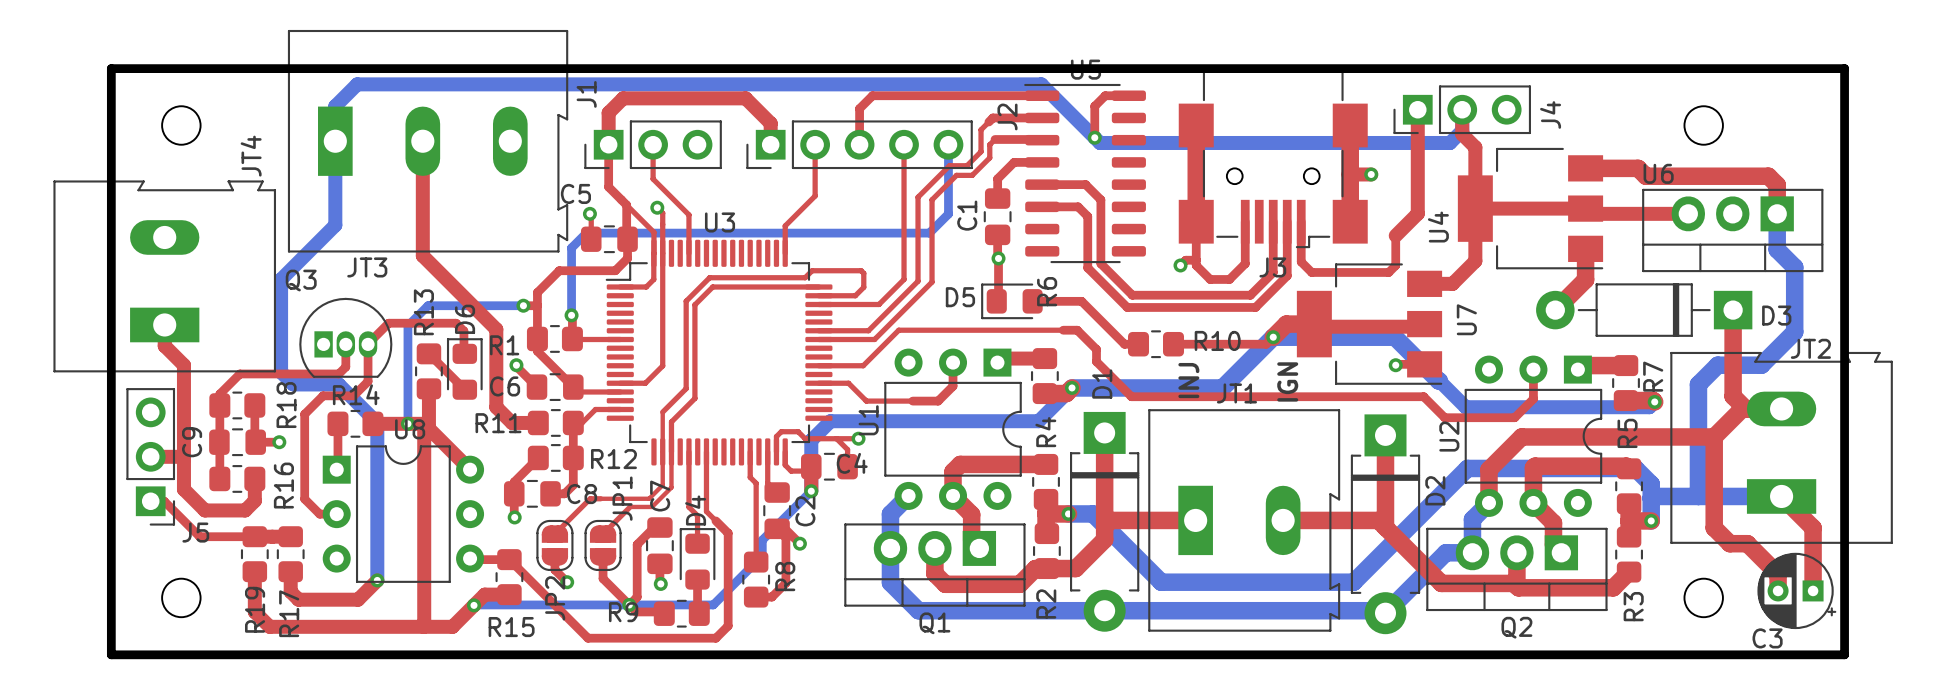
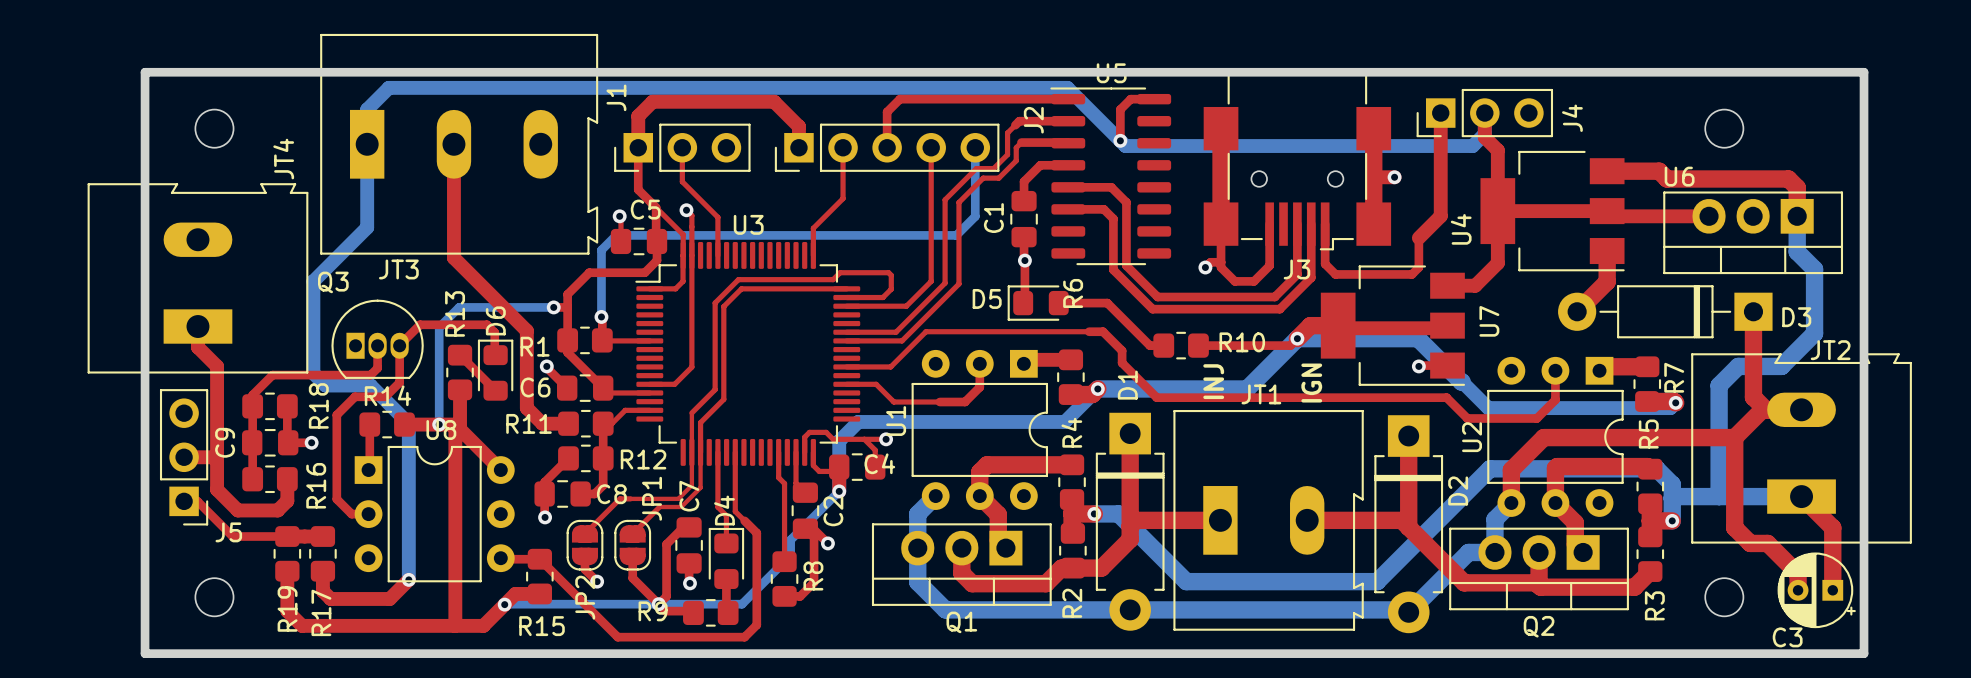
C5 name position: C5 (575, 193) -> C5 (645, 209)

